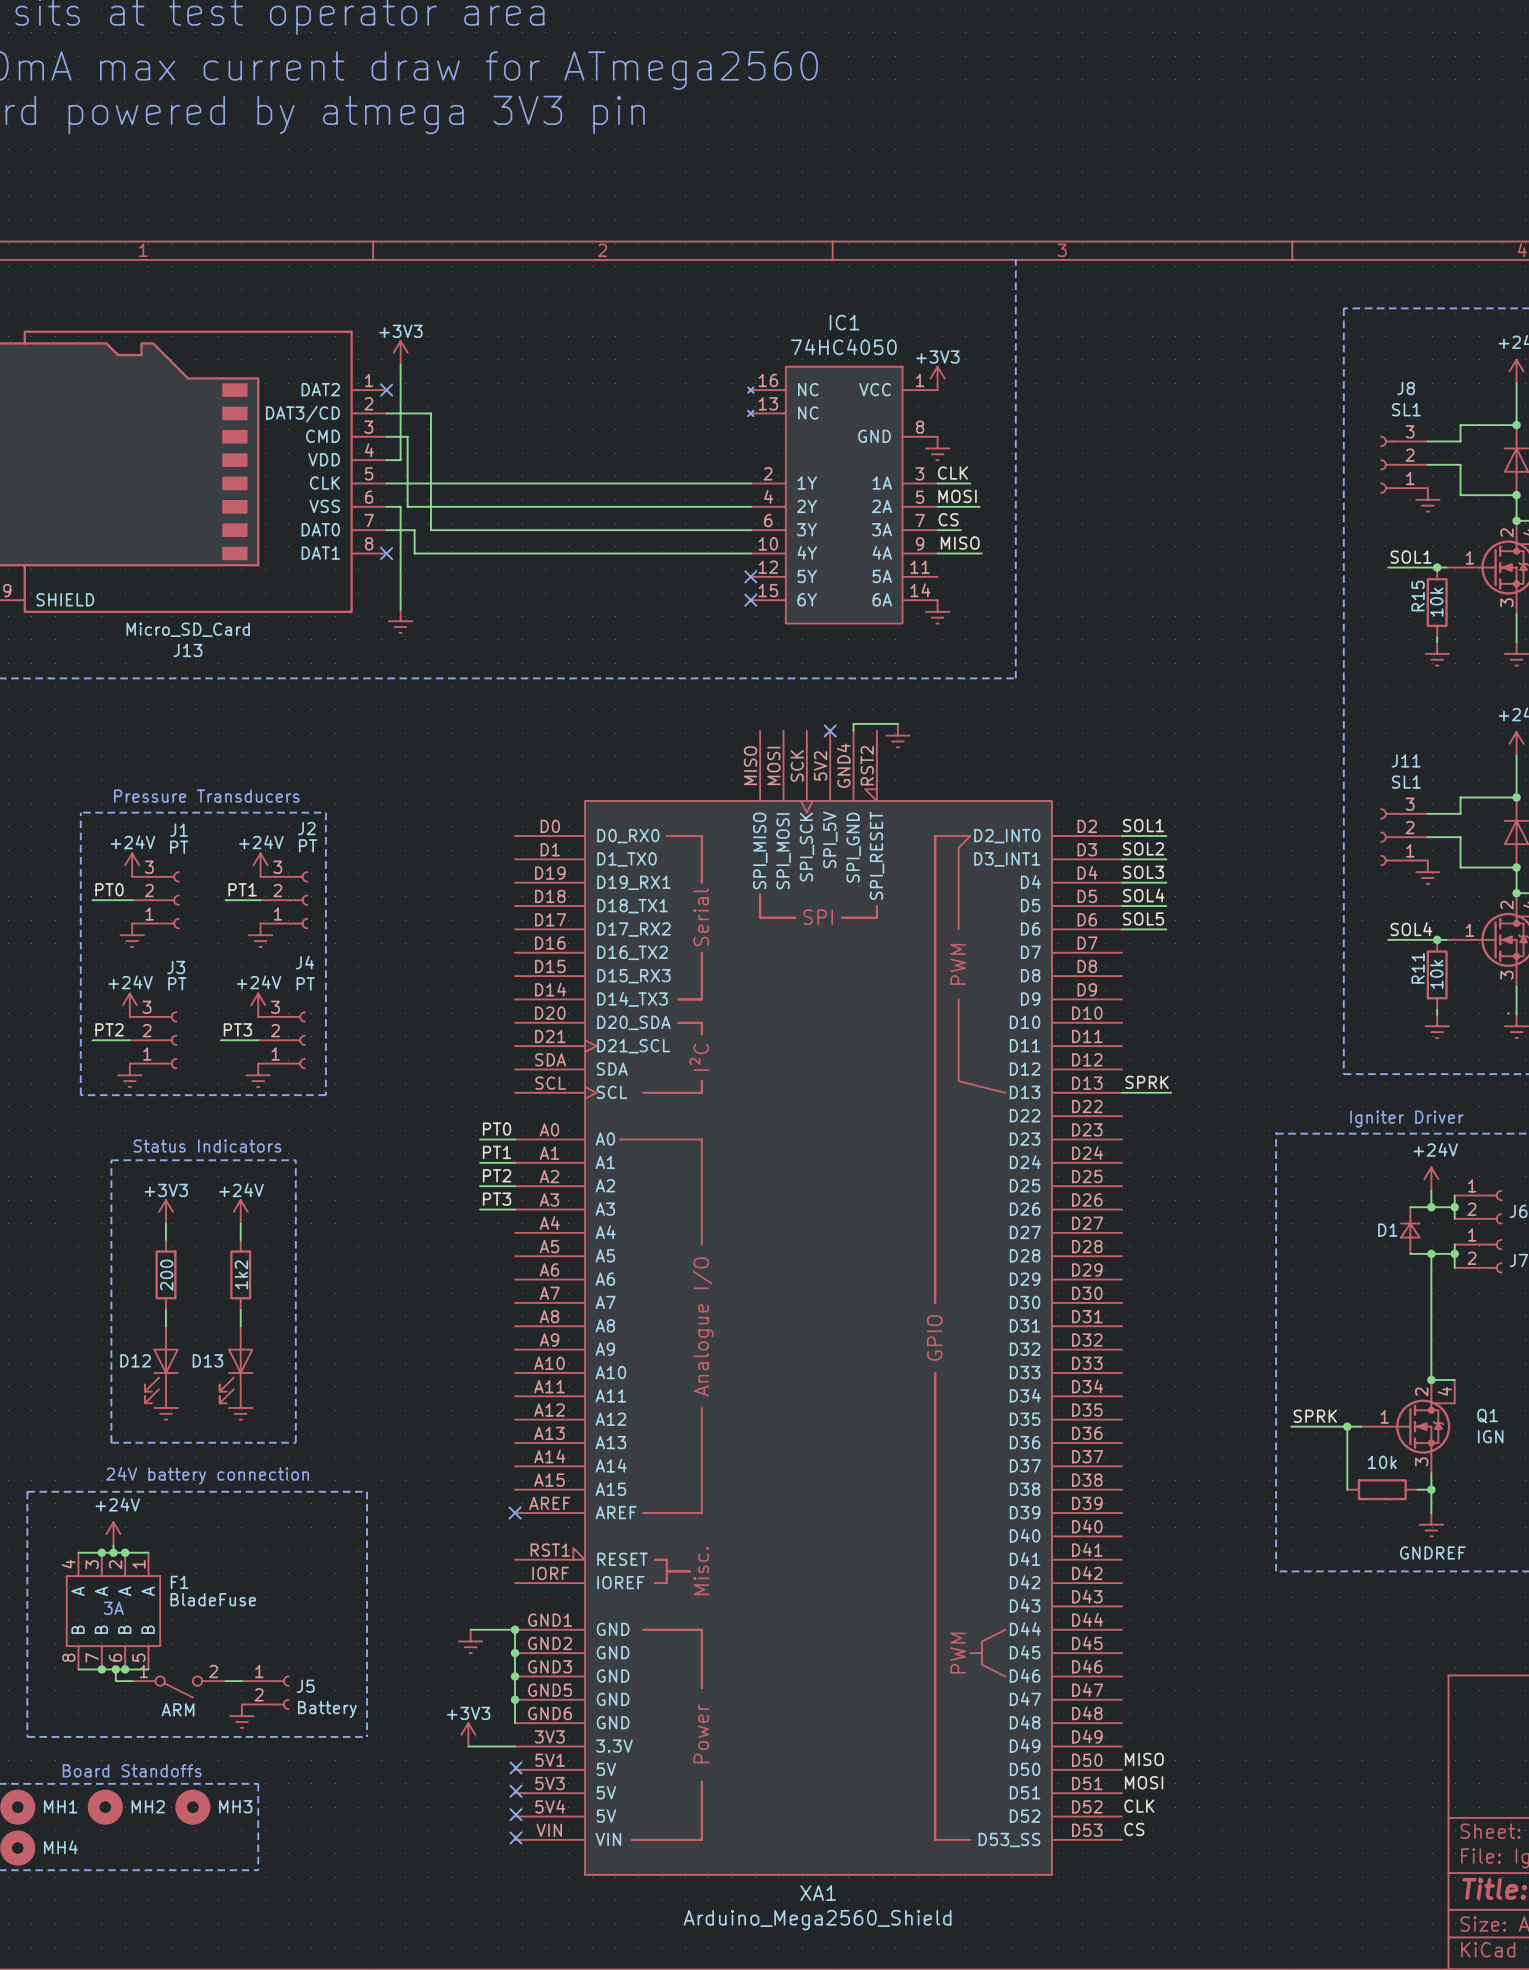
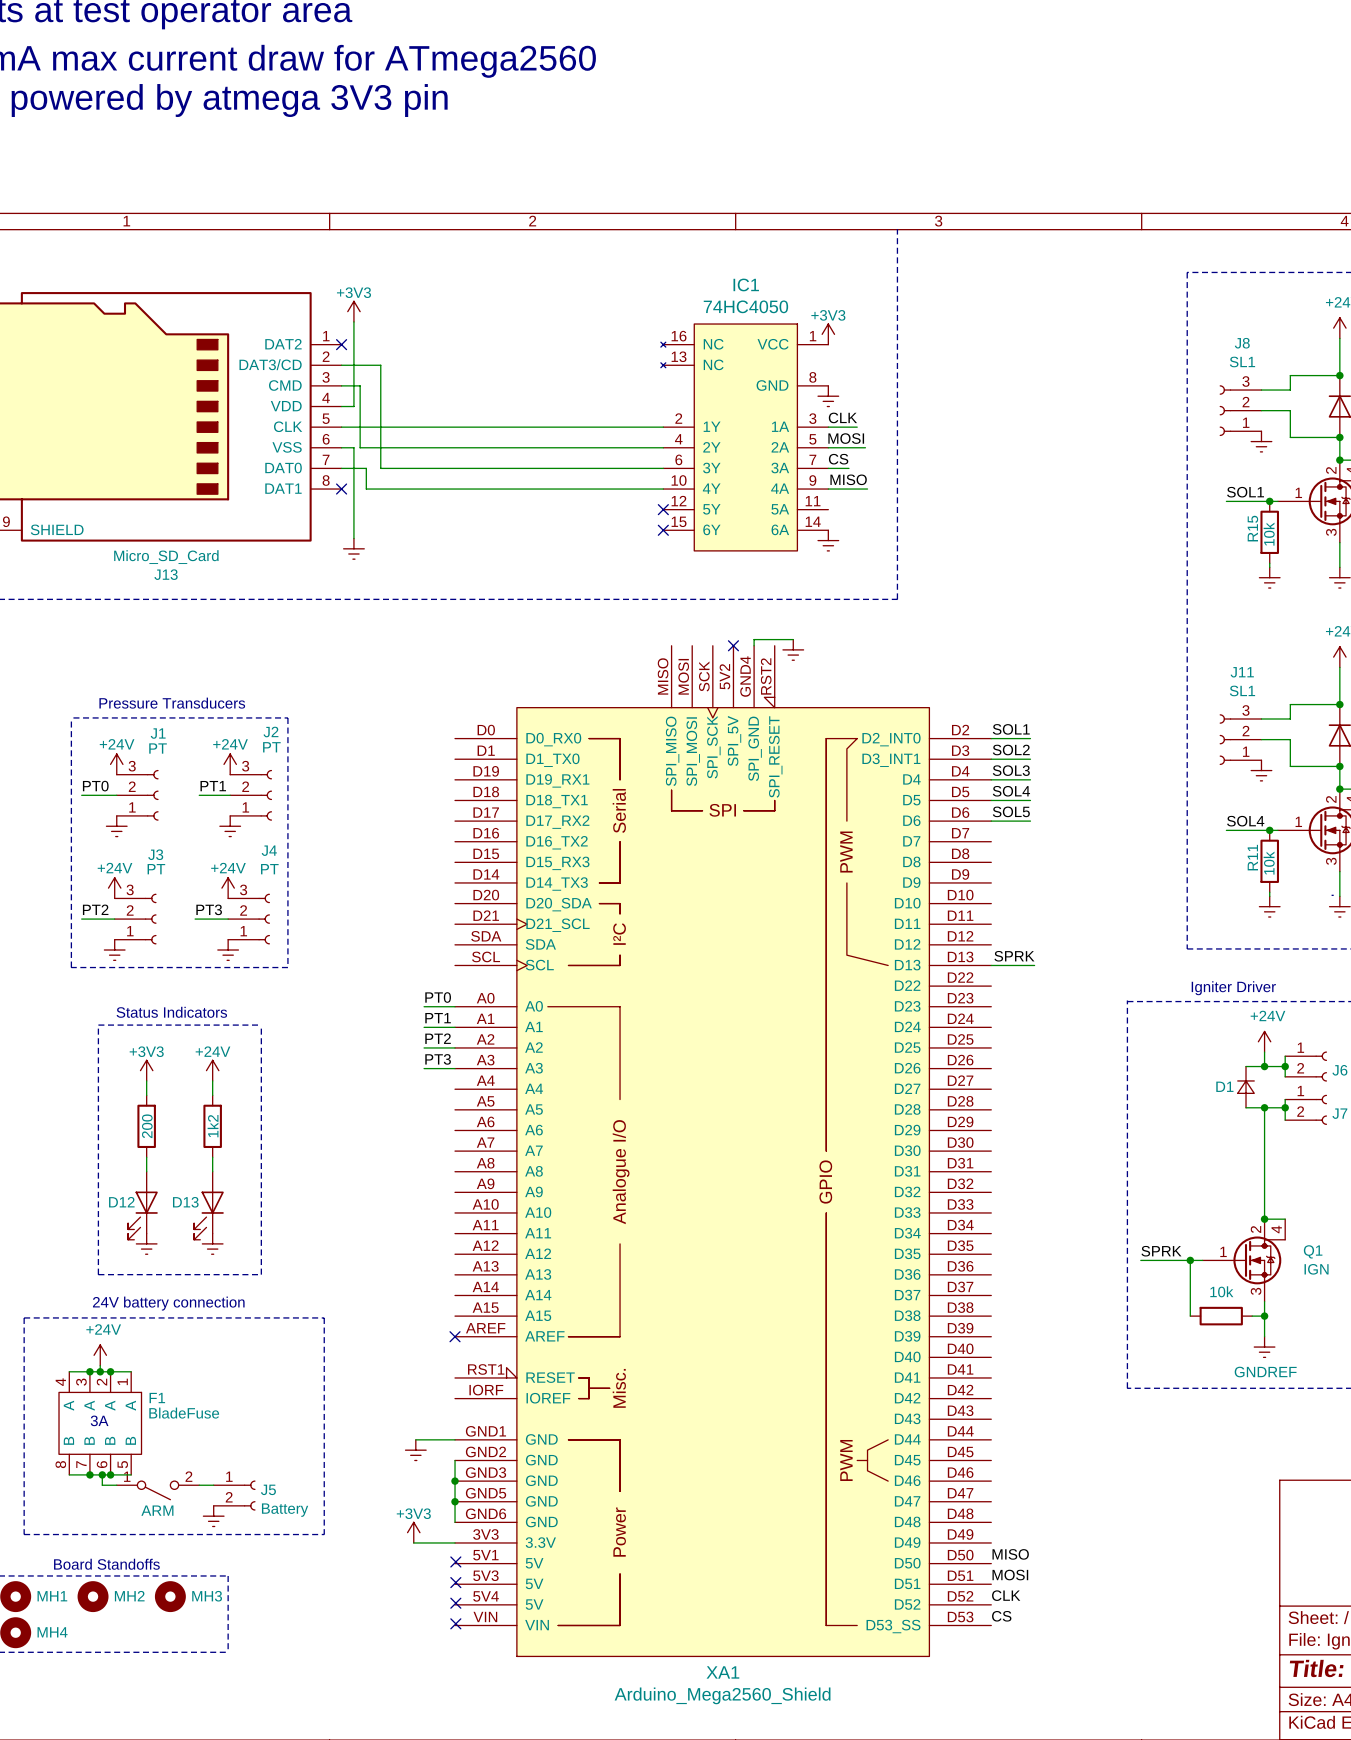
wire: (515, 1629) (515, 1653) -> none
junction: (515, 1629) -> none
junction: (515, 1653) -> none

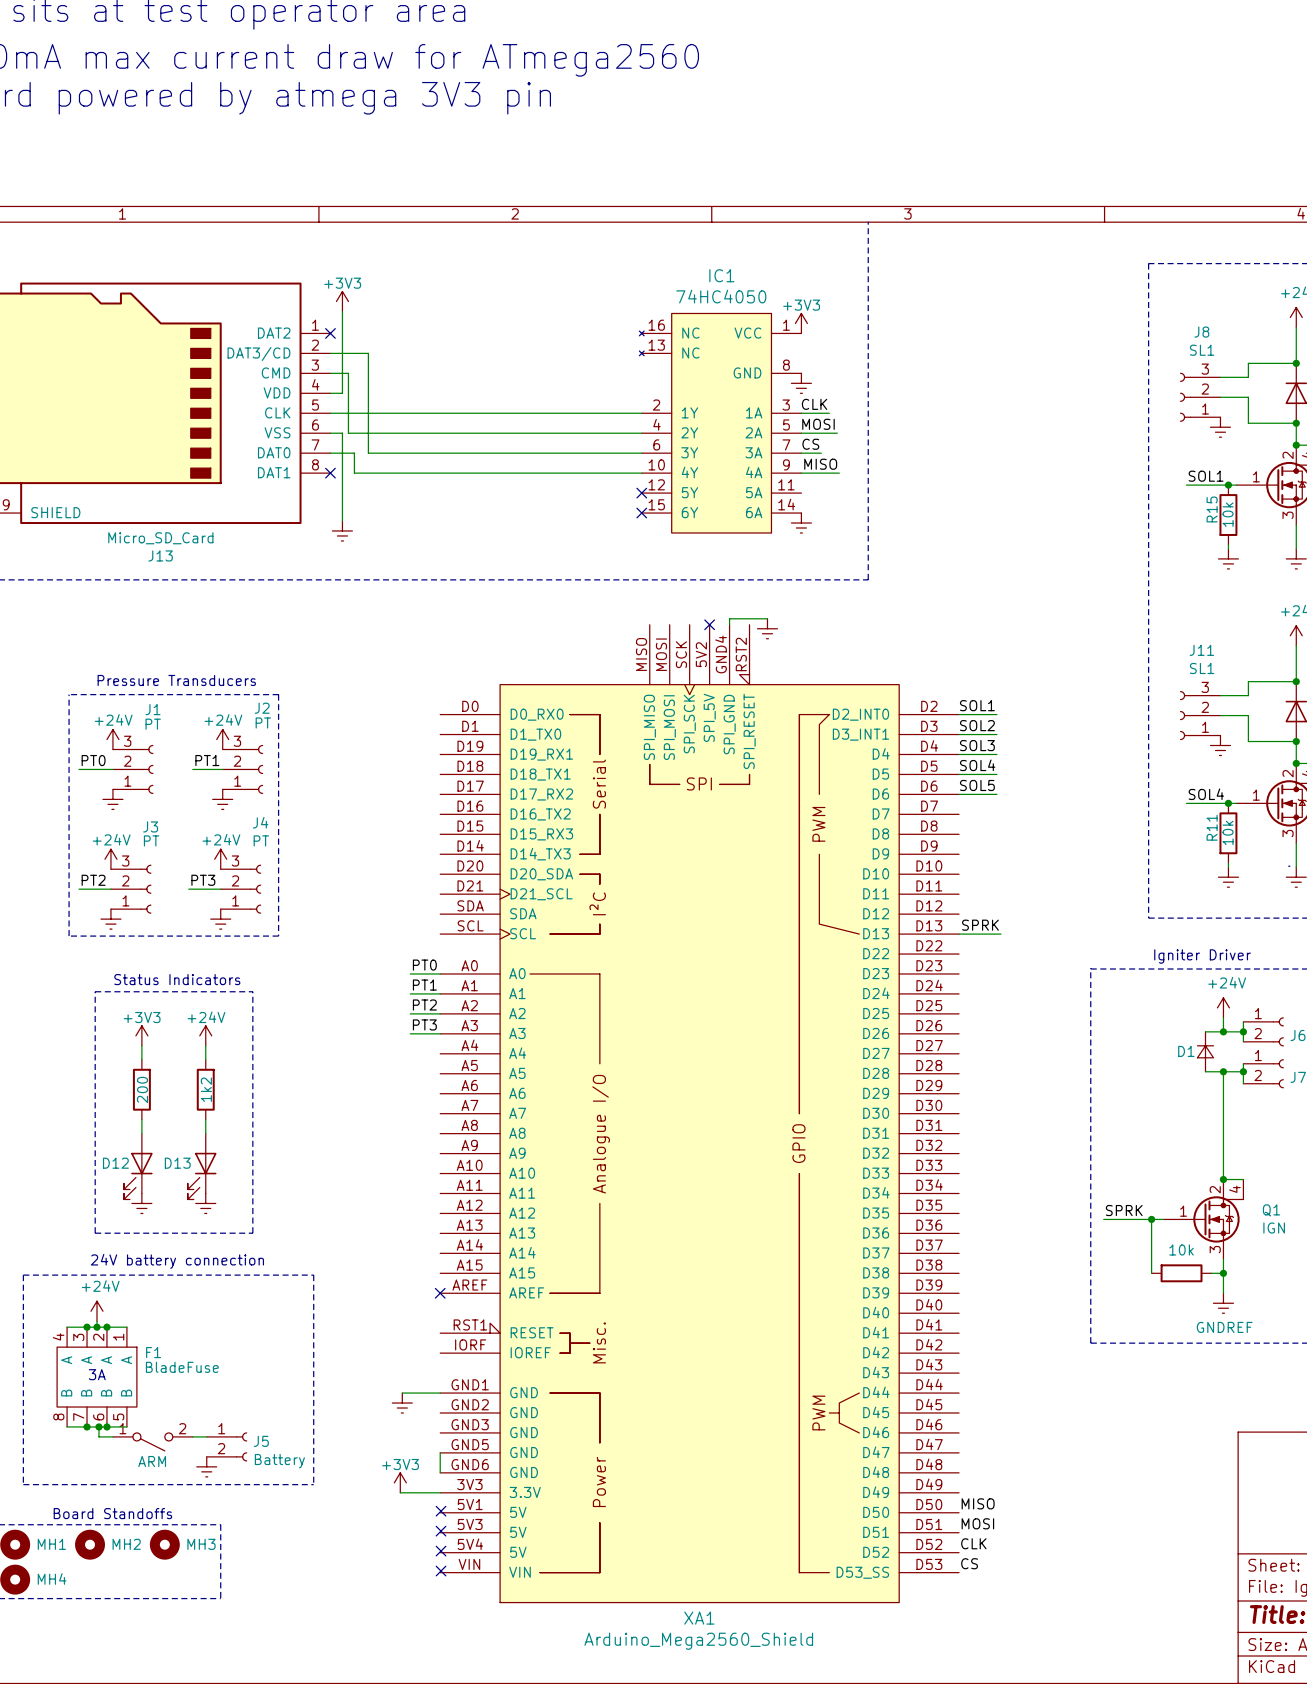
wire: (455, 1460) (455, 1501) -> none
junction: (455, 1481) -> none
junction: (455, 1501) -> none

